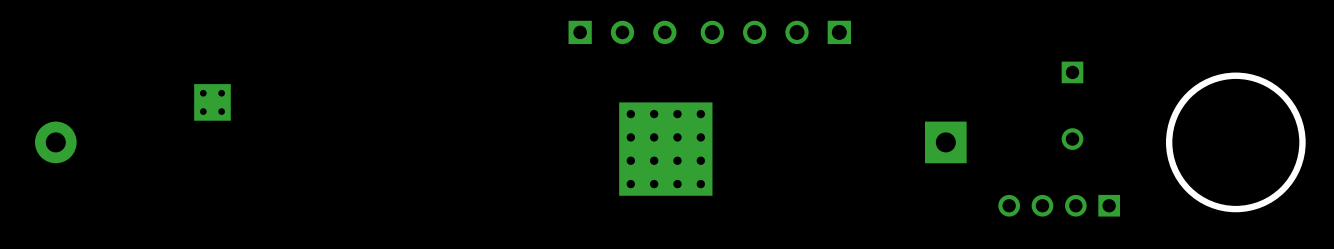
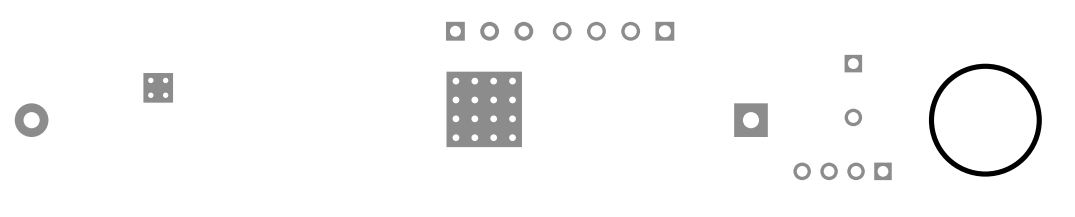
part position: (665, 149) -> (484, 109)

